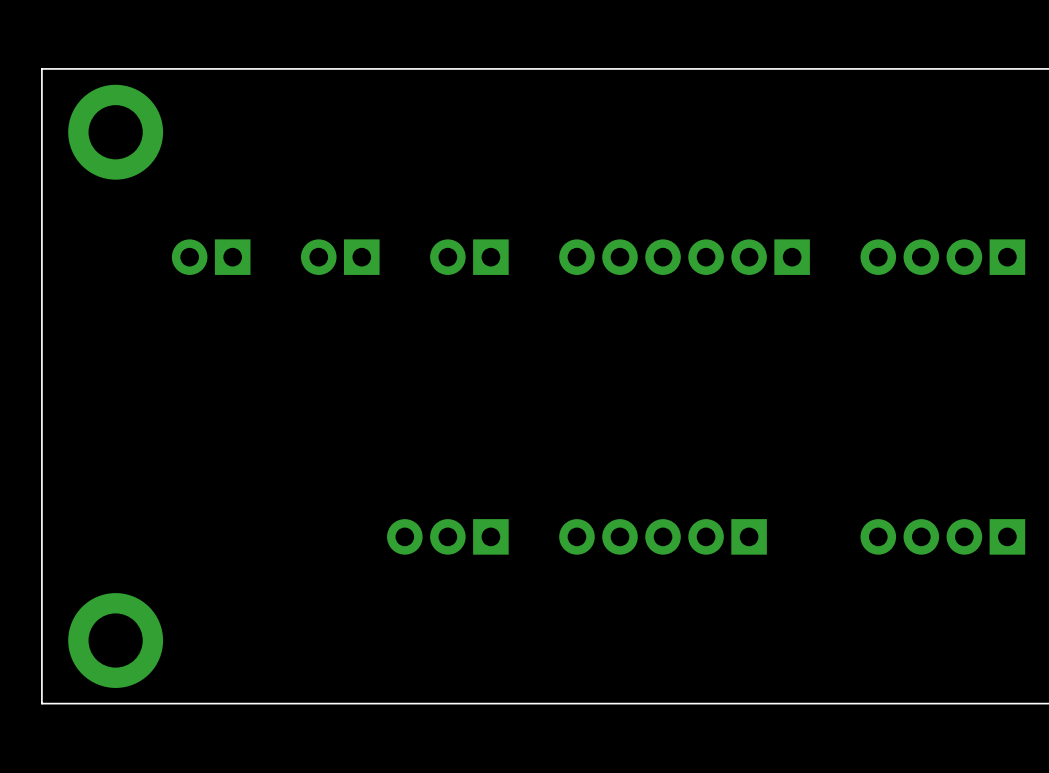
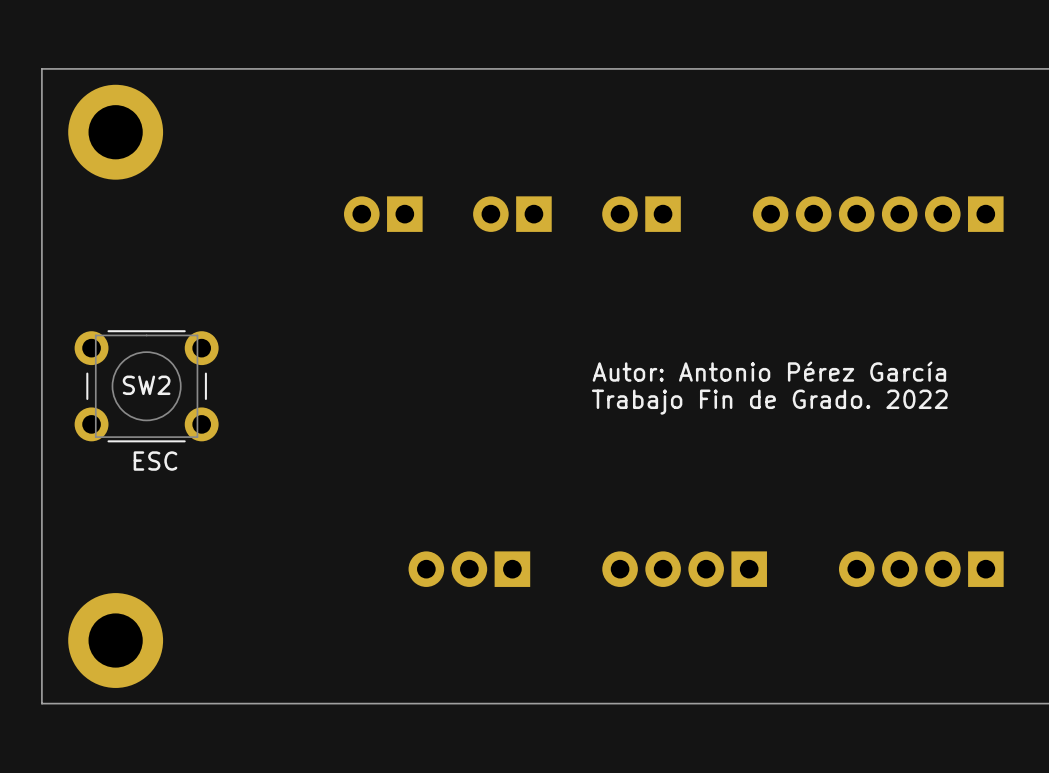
part: none -> (383, 214)
part: none -> (512, 214)
part: none -> (641, 214)
part: (211, 257) -> none
part: (340, 257) -> none
part: (469, 257) -> none
part position: (684, 257) -> (878, 214)
part: (942, 257) -> none
text: none -> Autor: Antonio Pérez García (769, 371)
SW2: none -> ESC (146, 386)
text: none -> Trabajo Fin de Grado. 2022 (769, 402)
part position: (447, 536) -> (469, 569)
part: (663, 536) -> none
part position: (942, 536) -> (921, 569)
part: none -> (684, 569)

